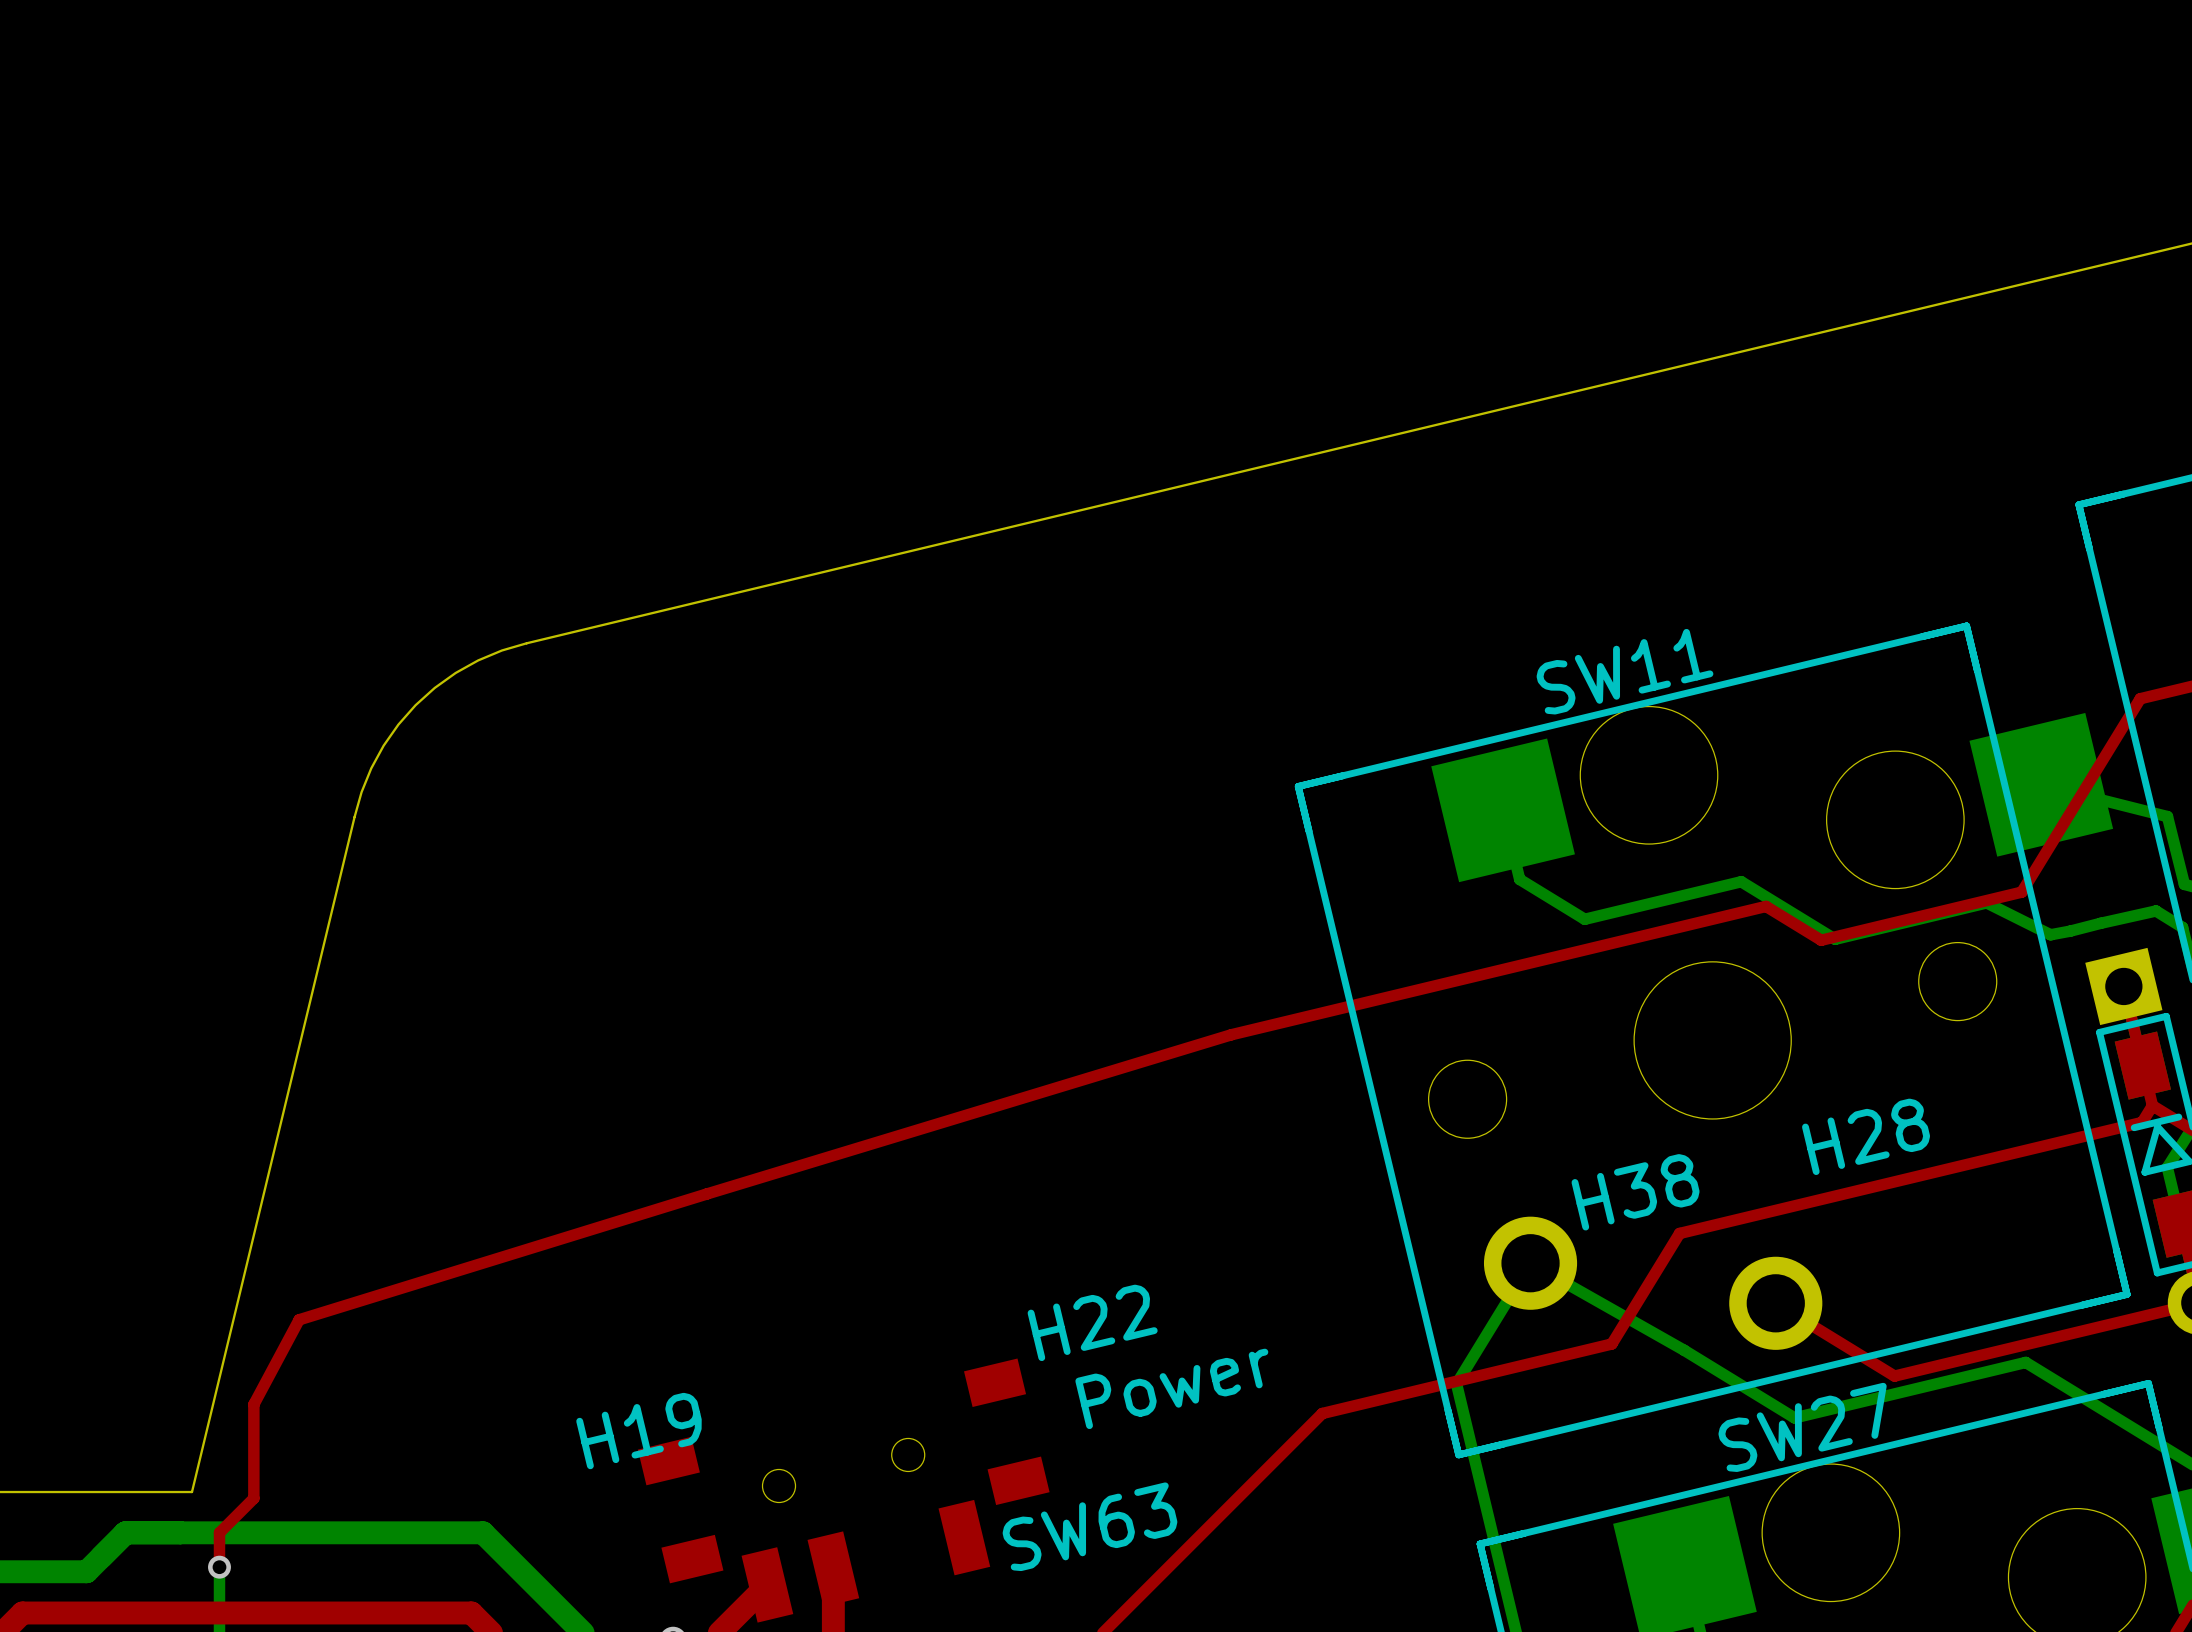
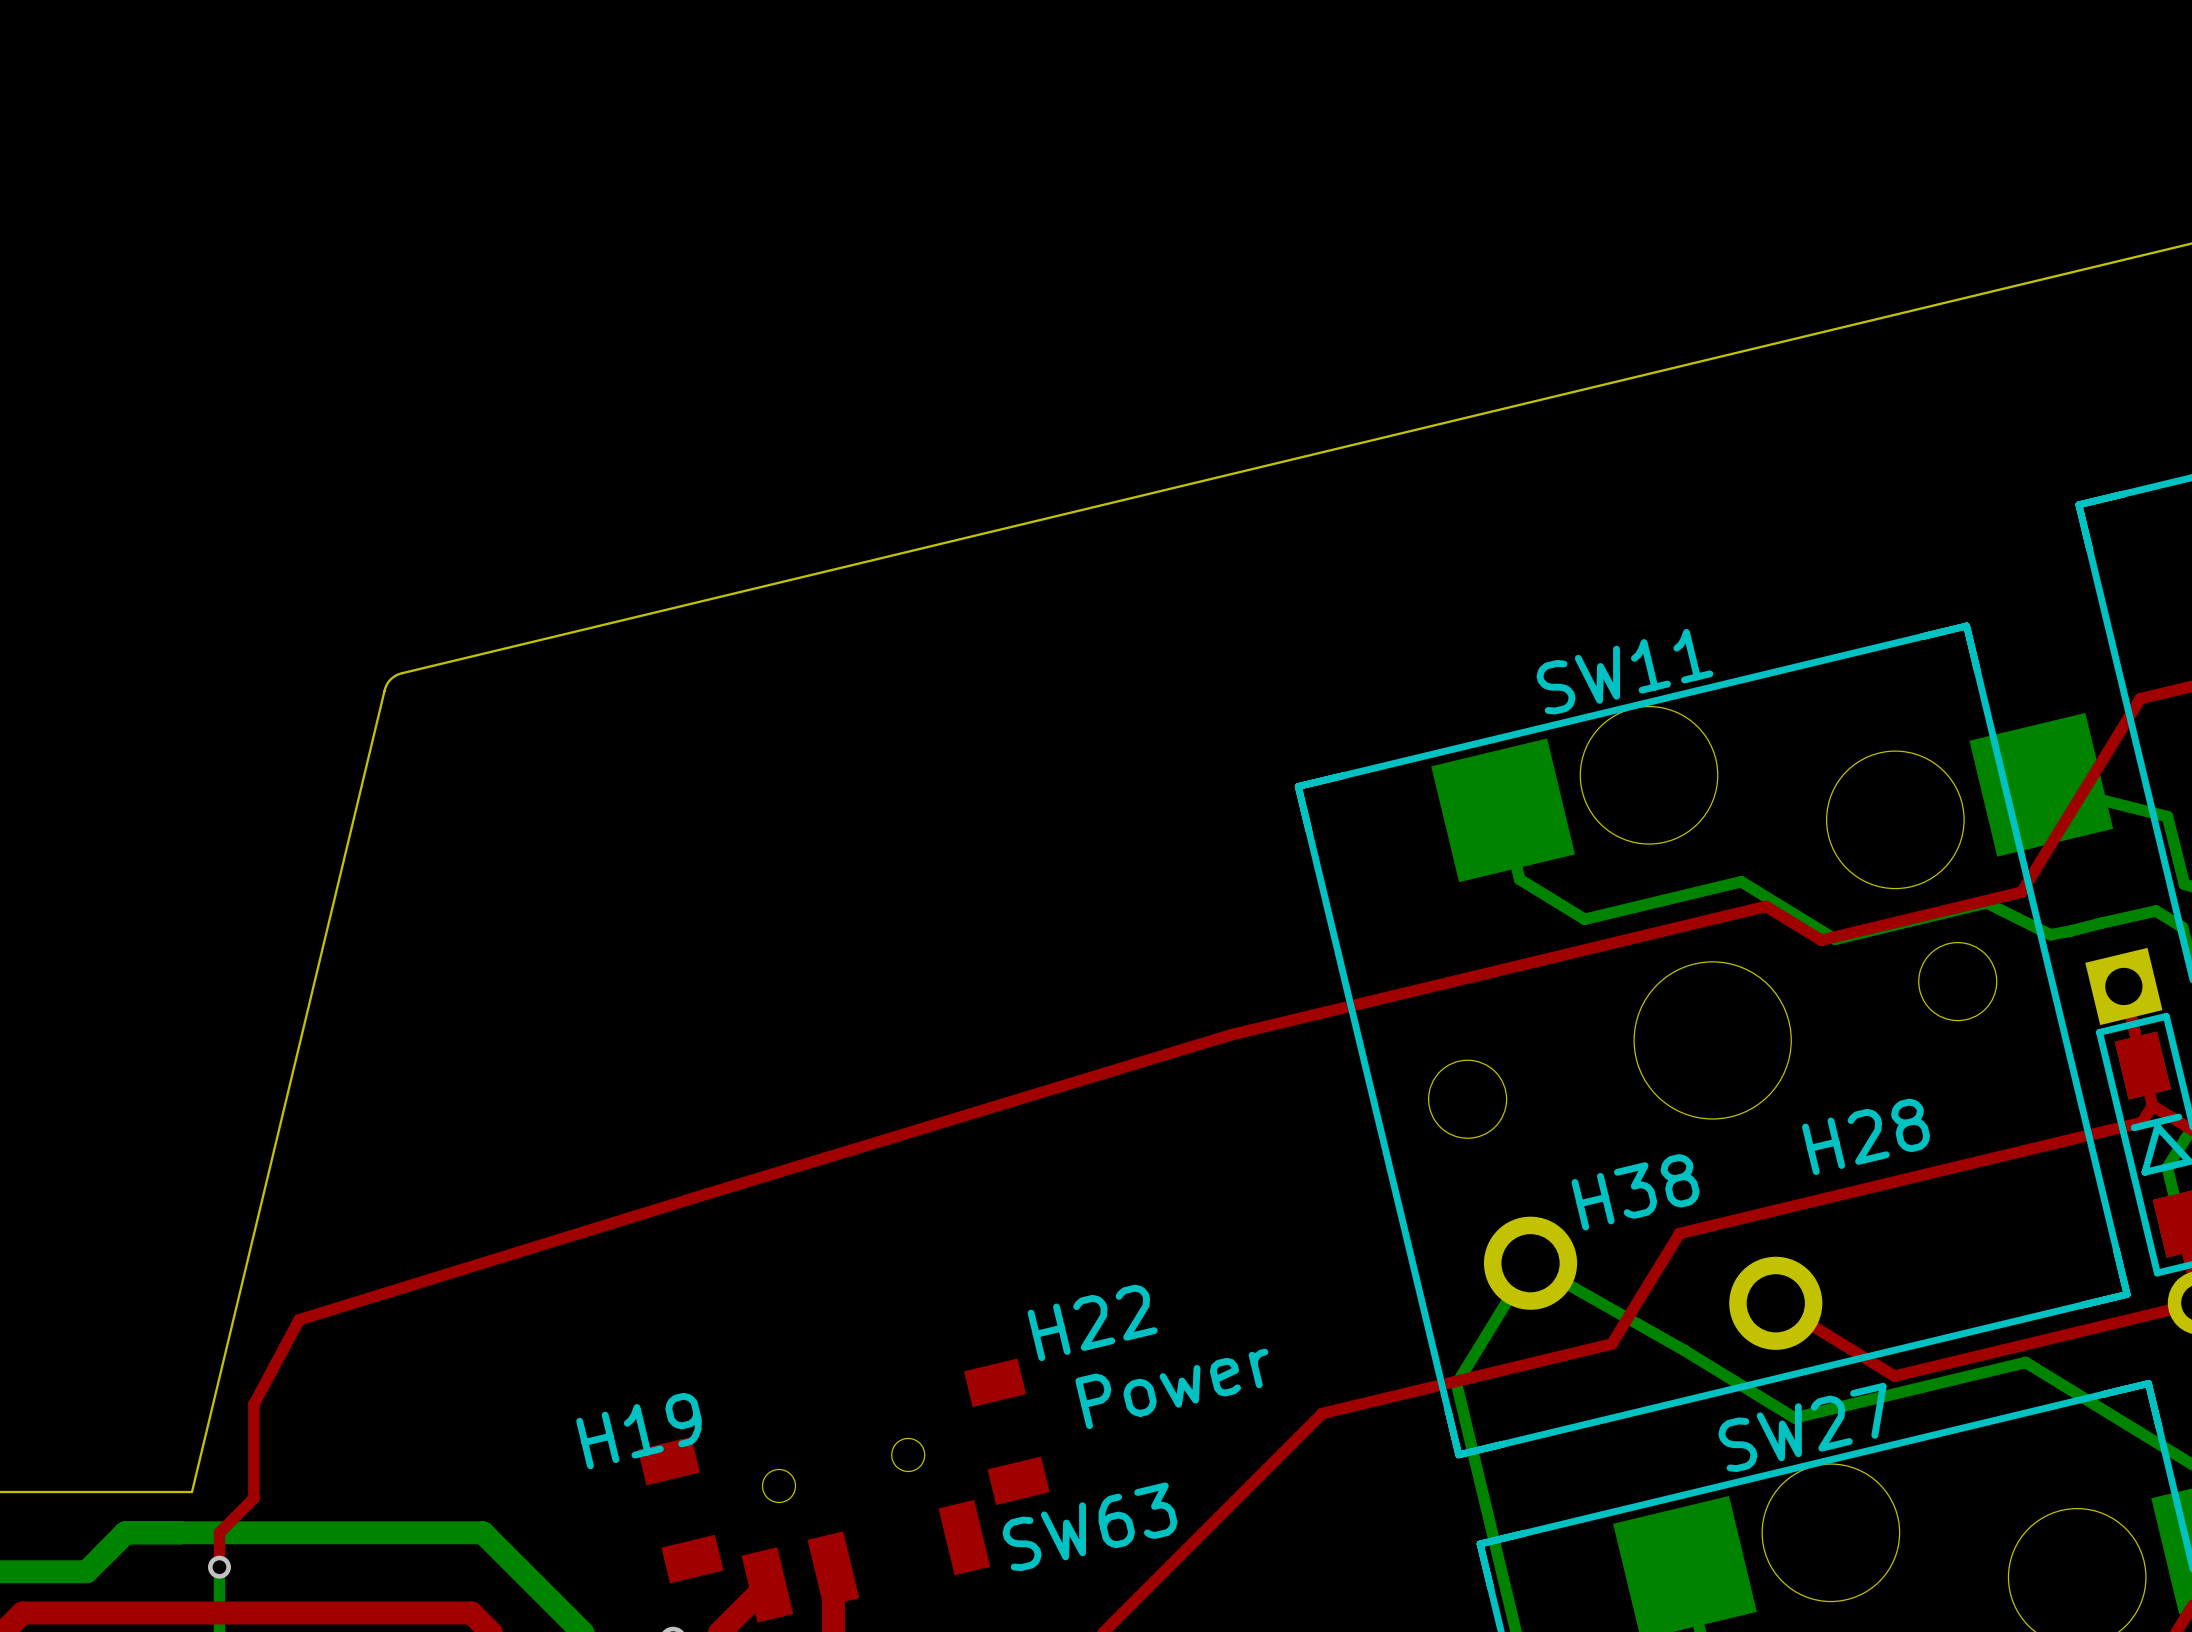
board edge: (526, 643) (501, 650) (455, 672) (415, 705) (383, 745) (361, 792) (192, 1492) -> (526, 643) (400, 673) (392, 677) (386, 686) (192, 1492)

